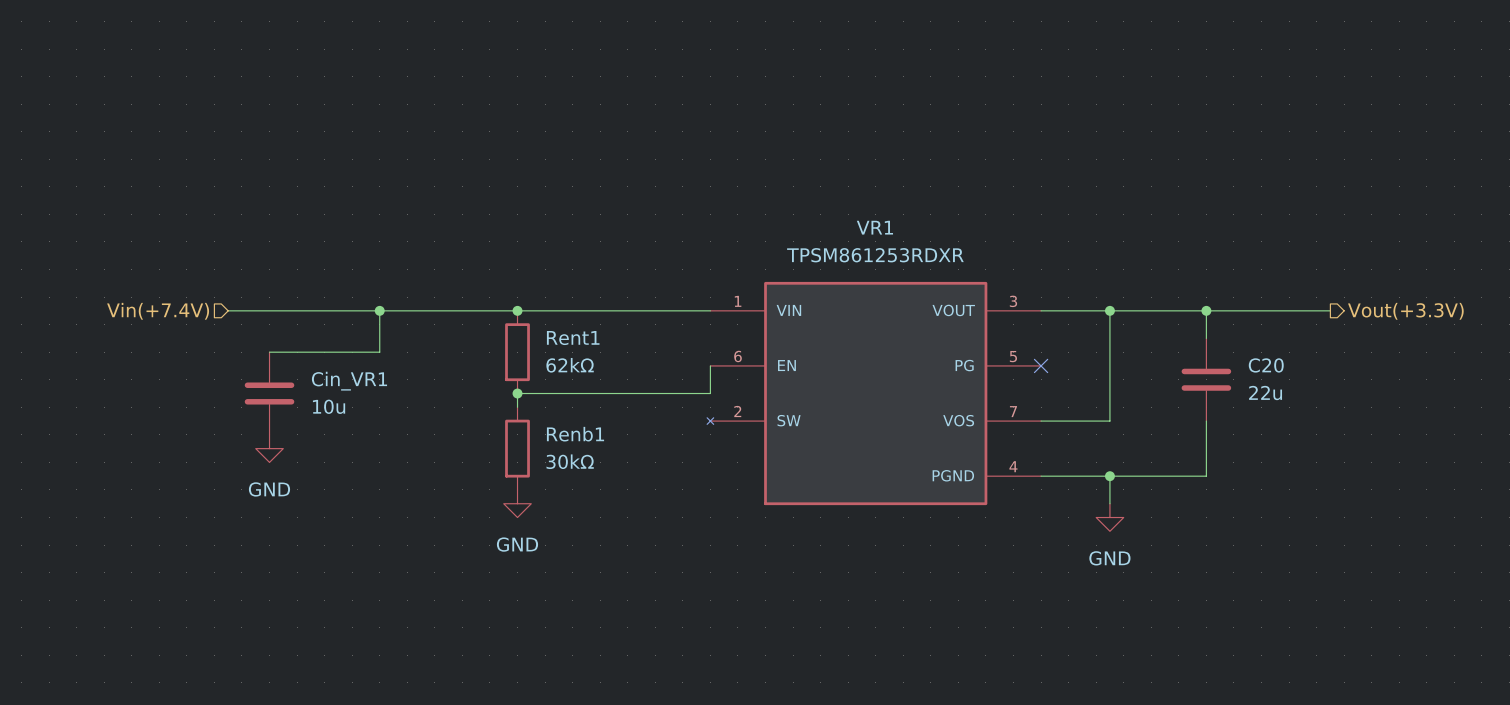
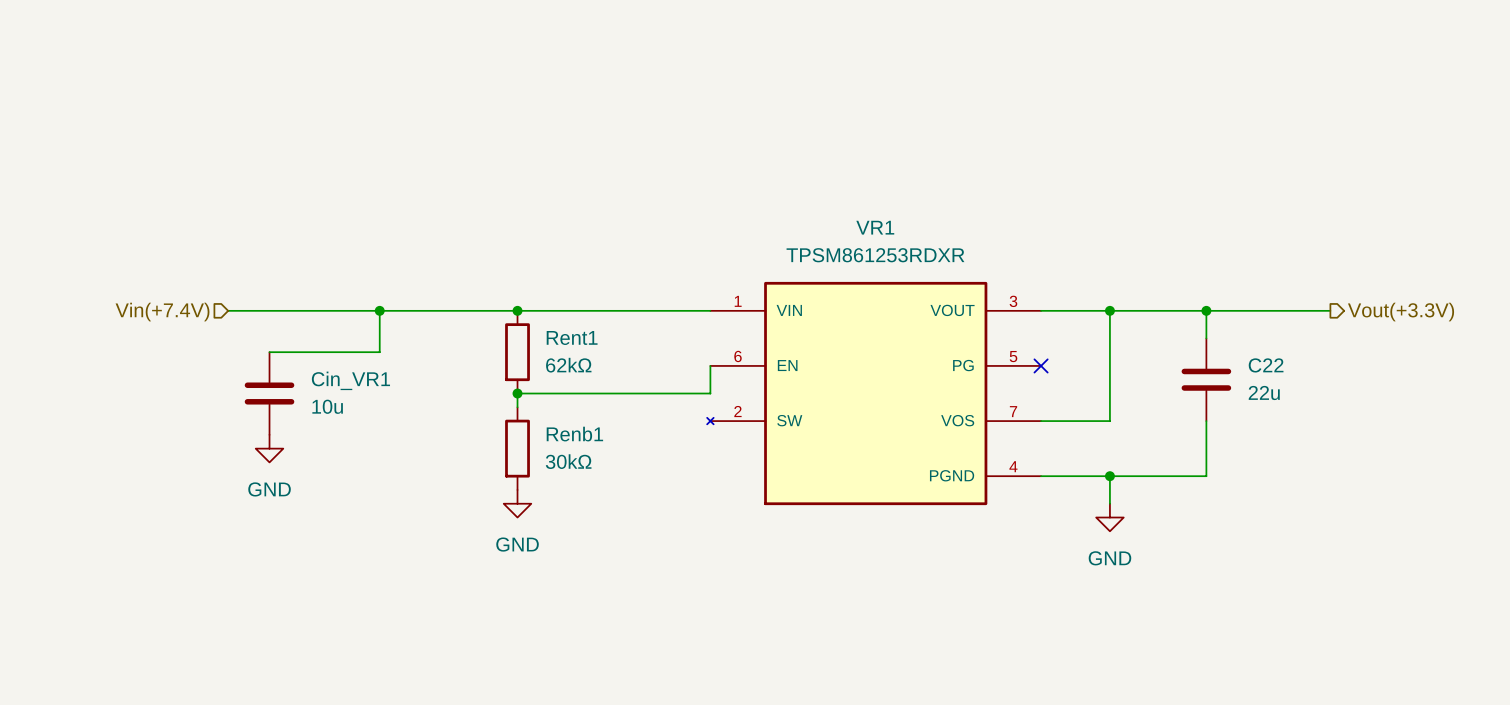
C20 name: C20 (1266, 365) -> C22 (1266, 365)

